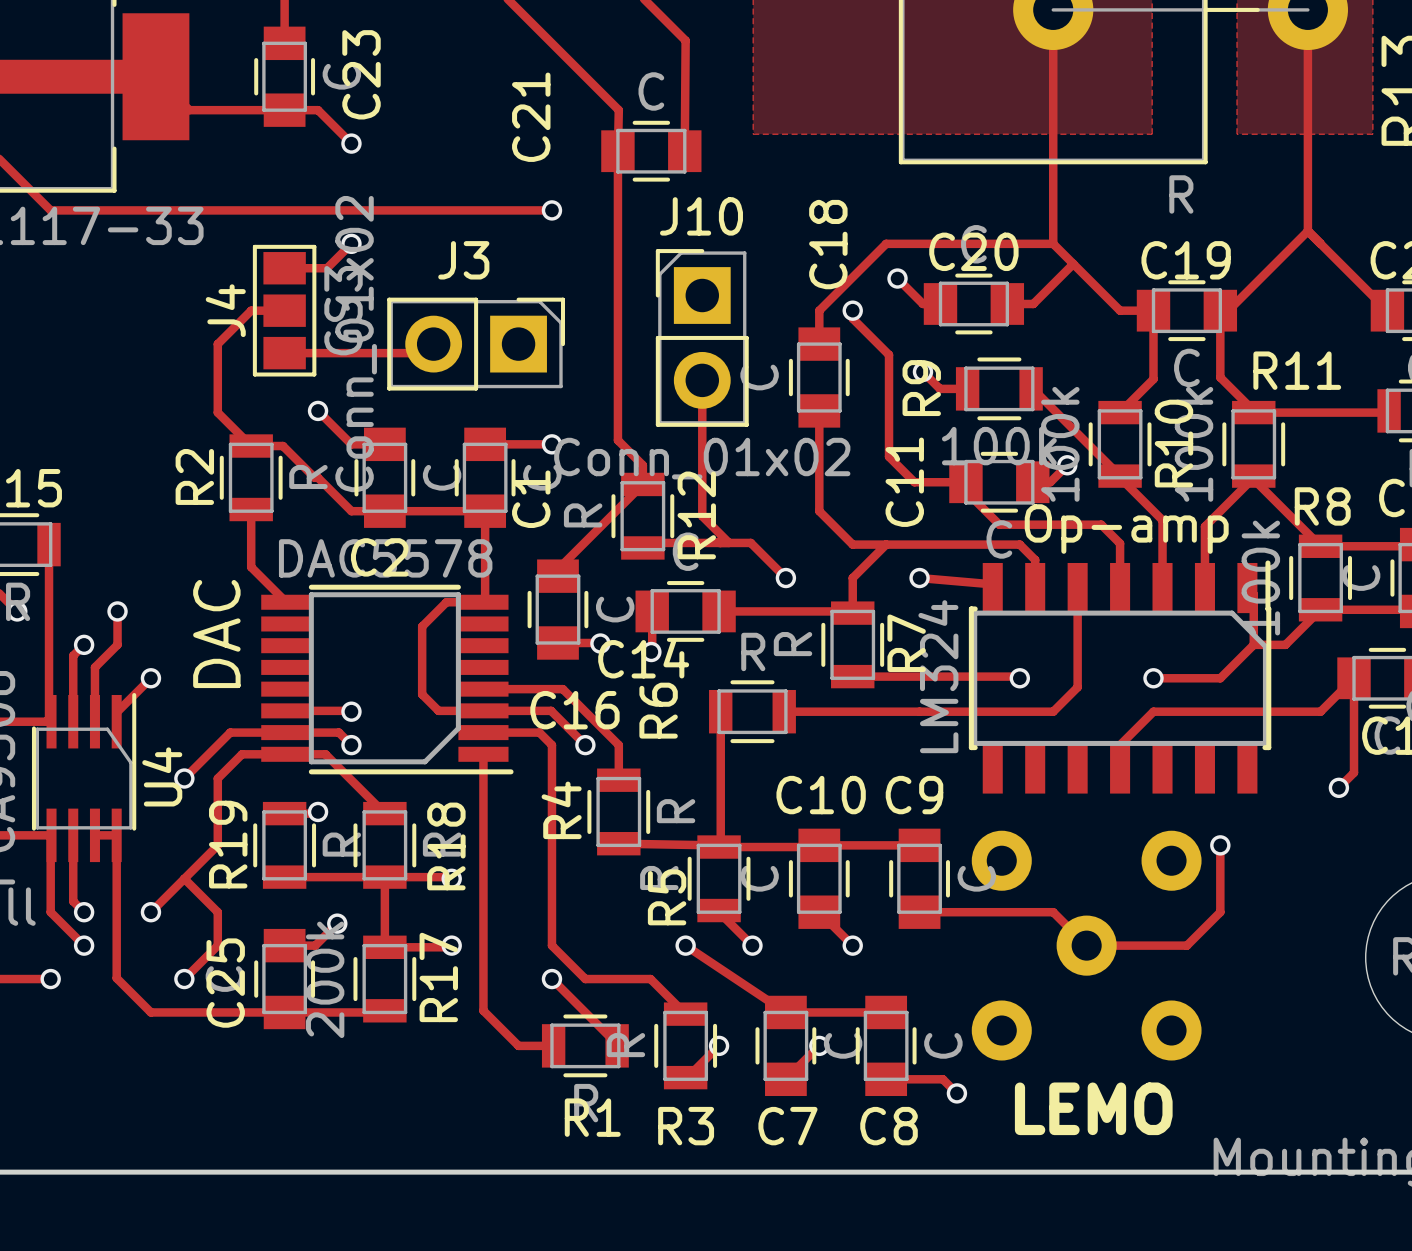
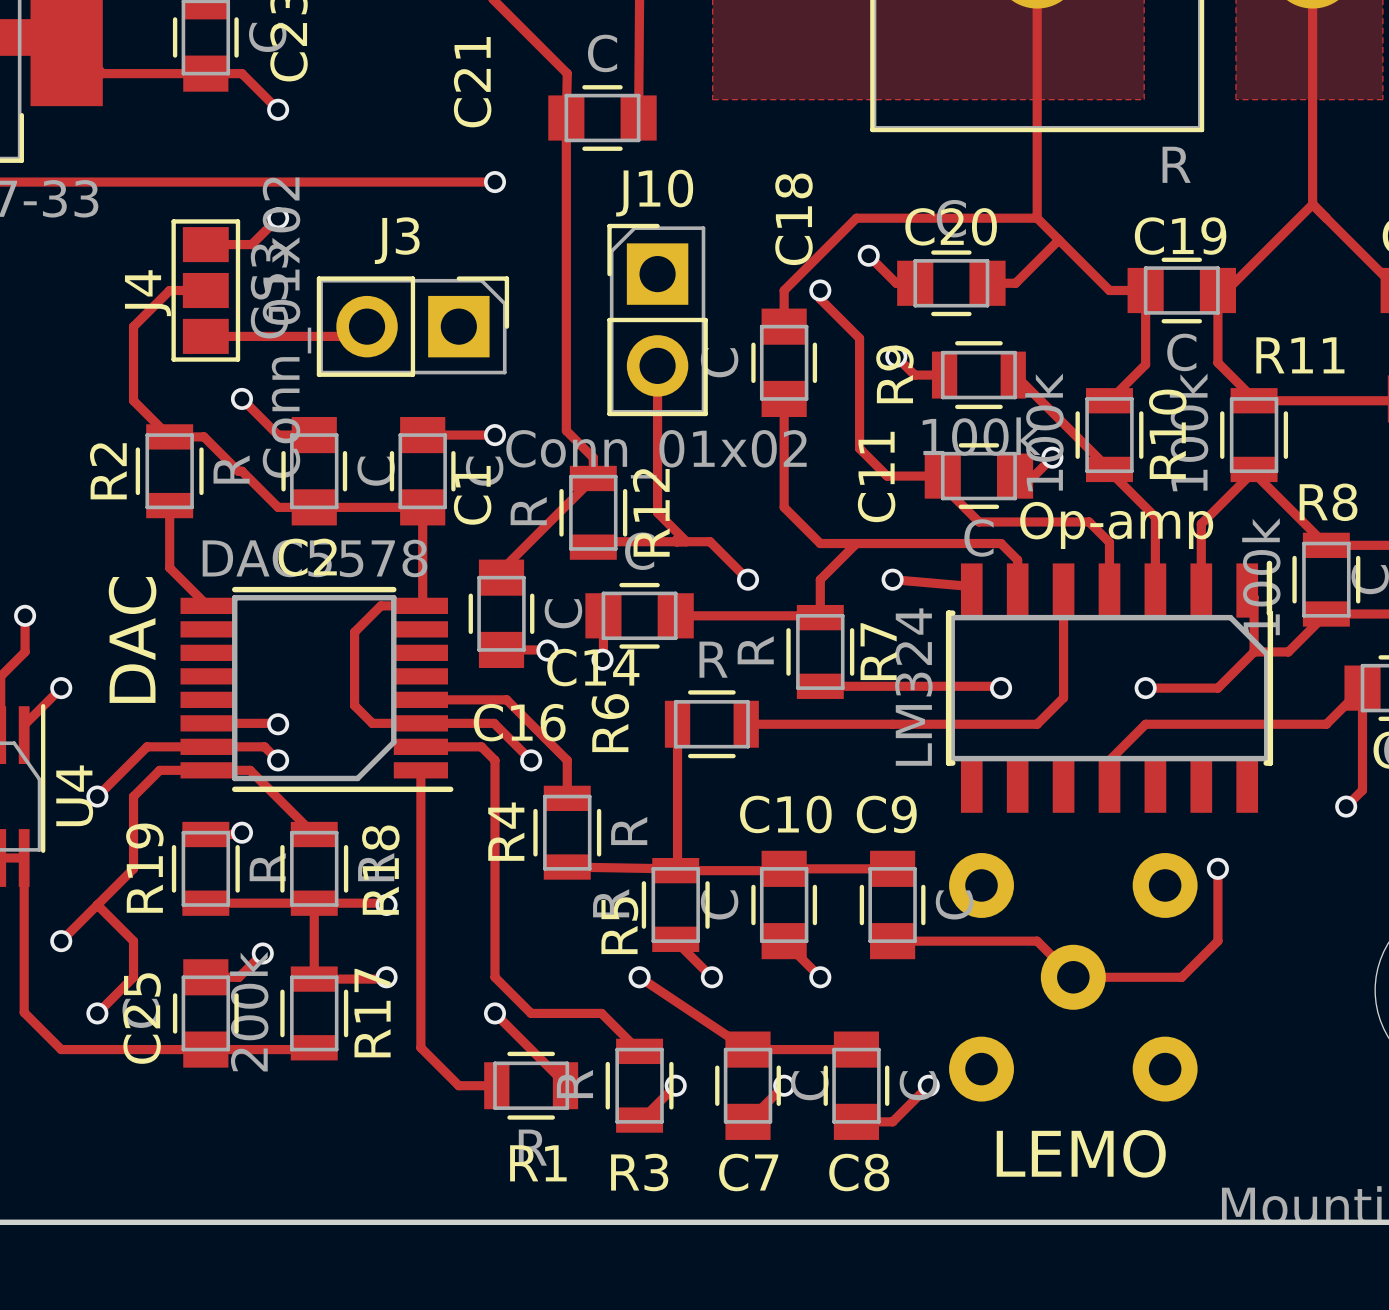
track: (919, 1079) (942, 1079) (956, 1093) -> (892, 1121) (928, 1085)
via position: (956, 1093) -> (928, 1085)

